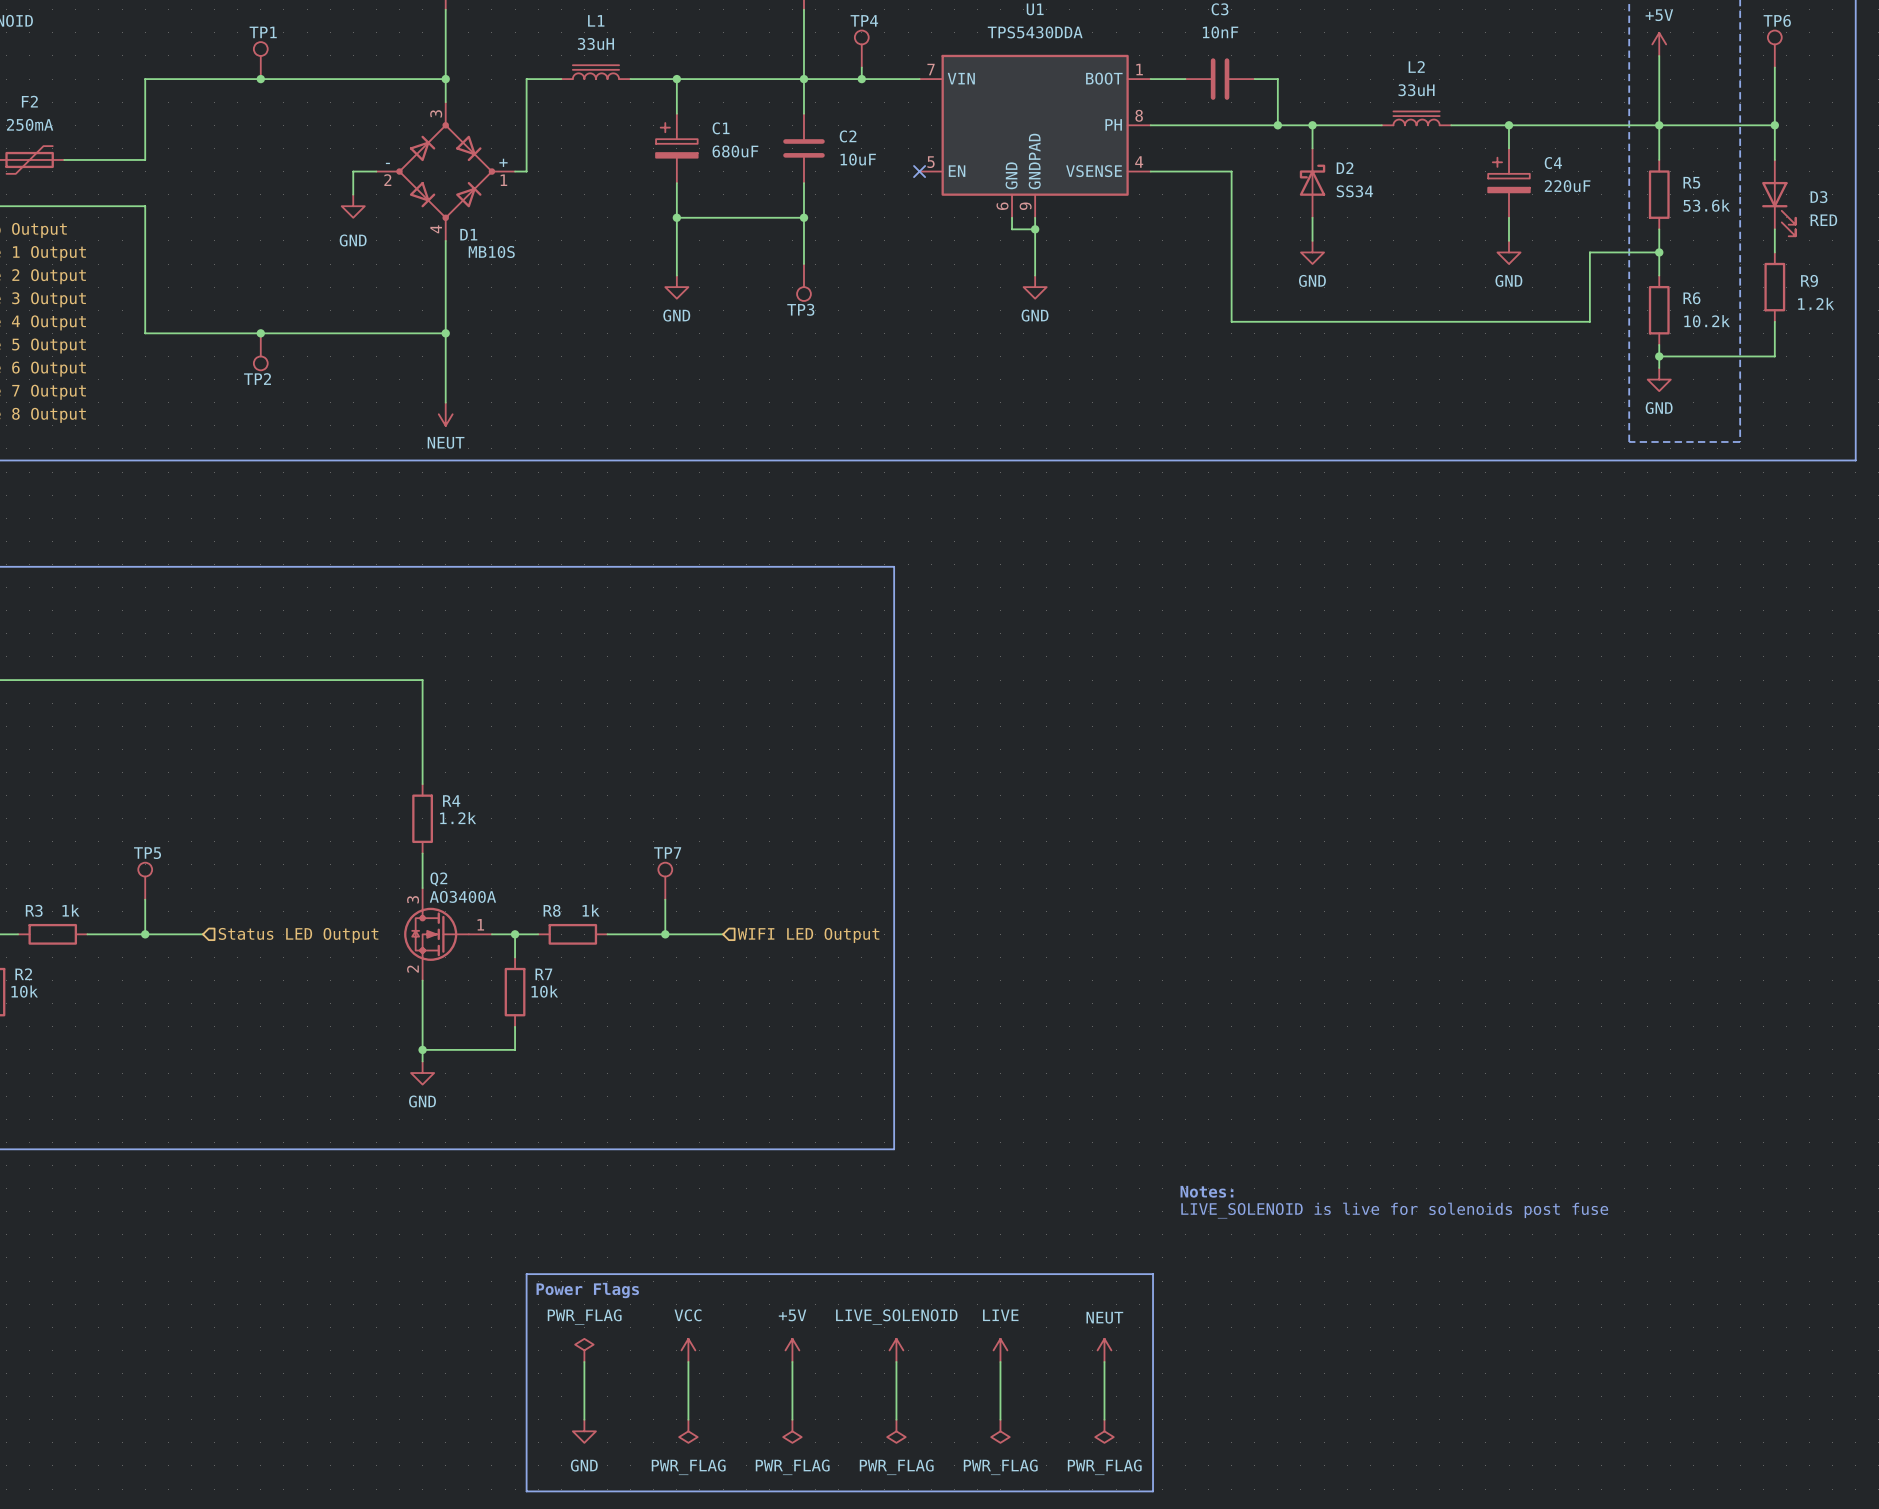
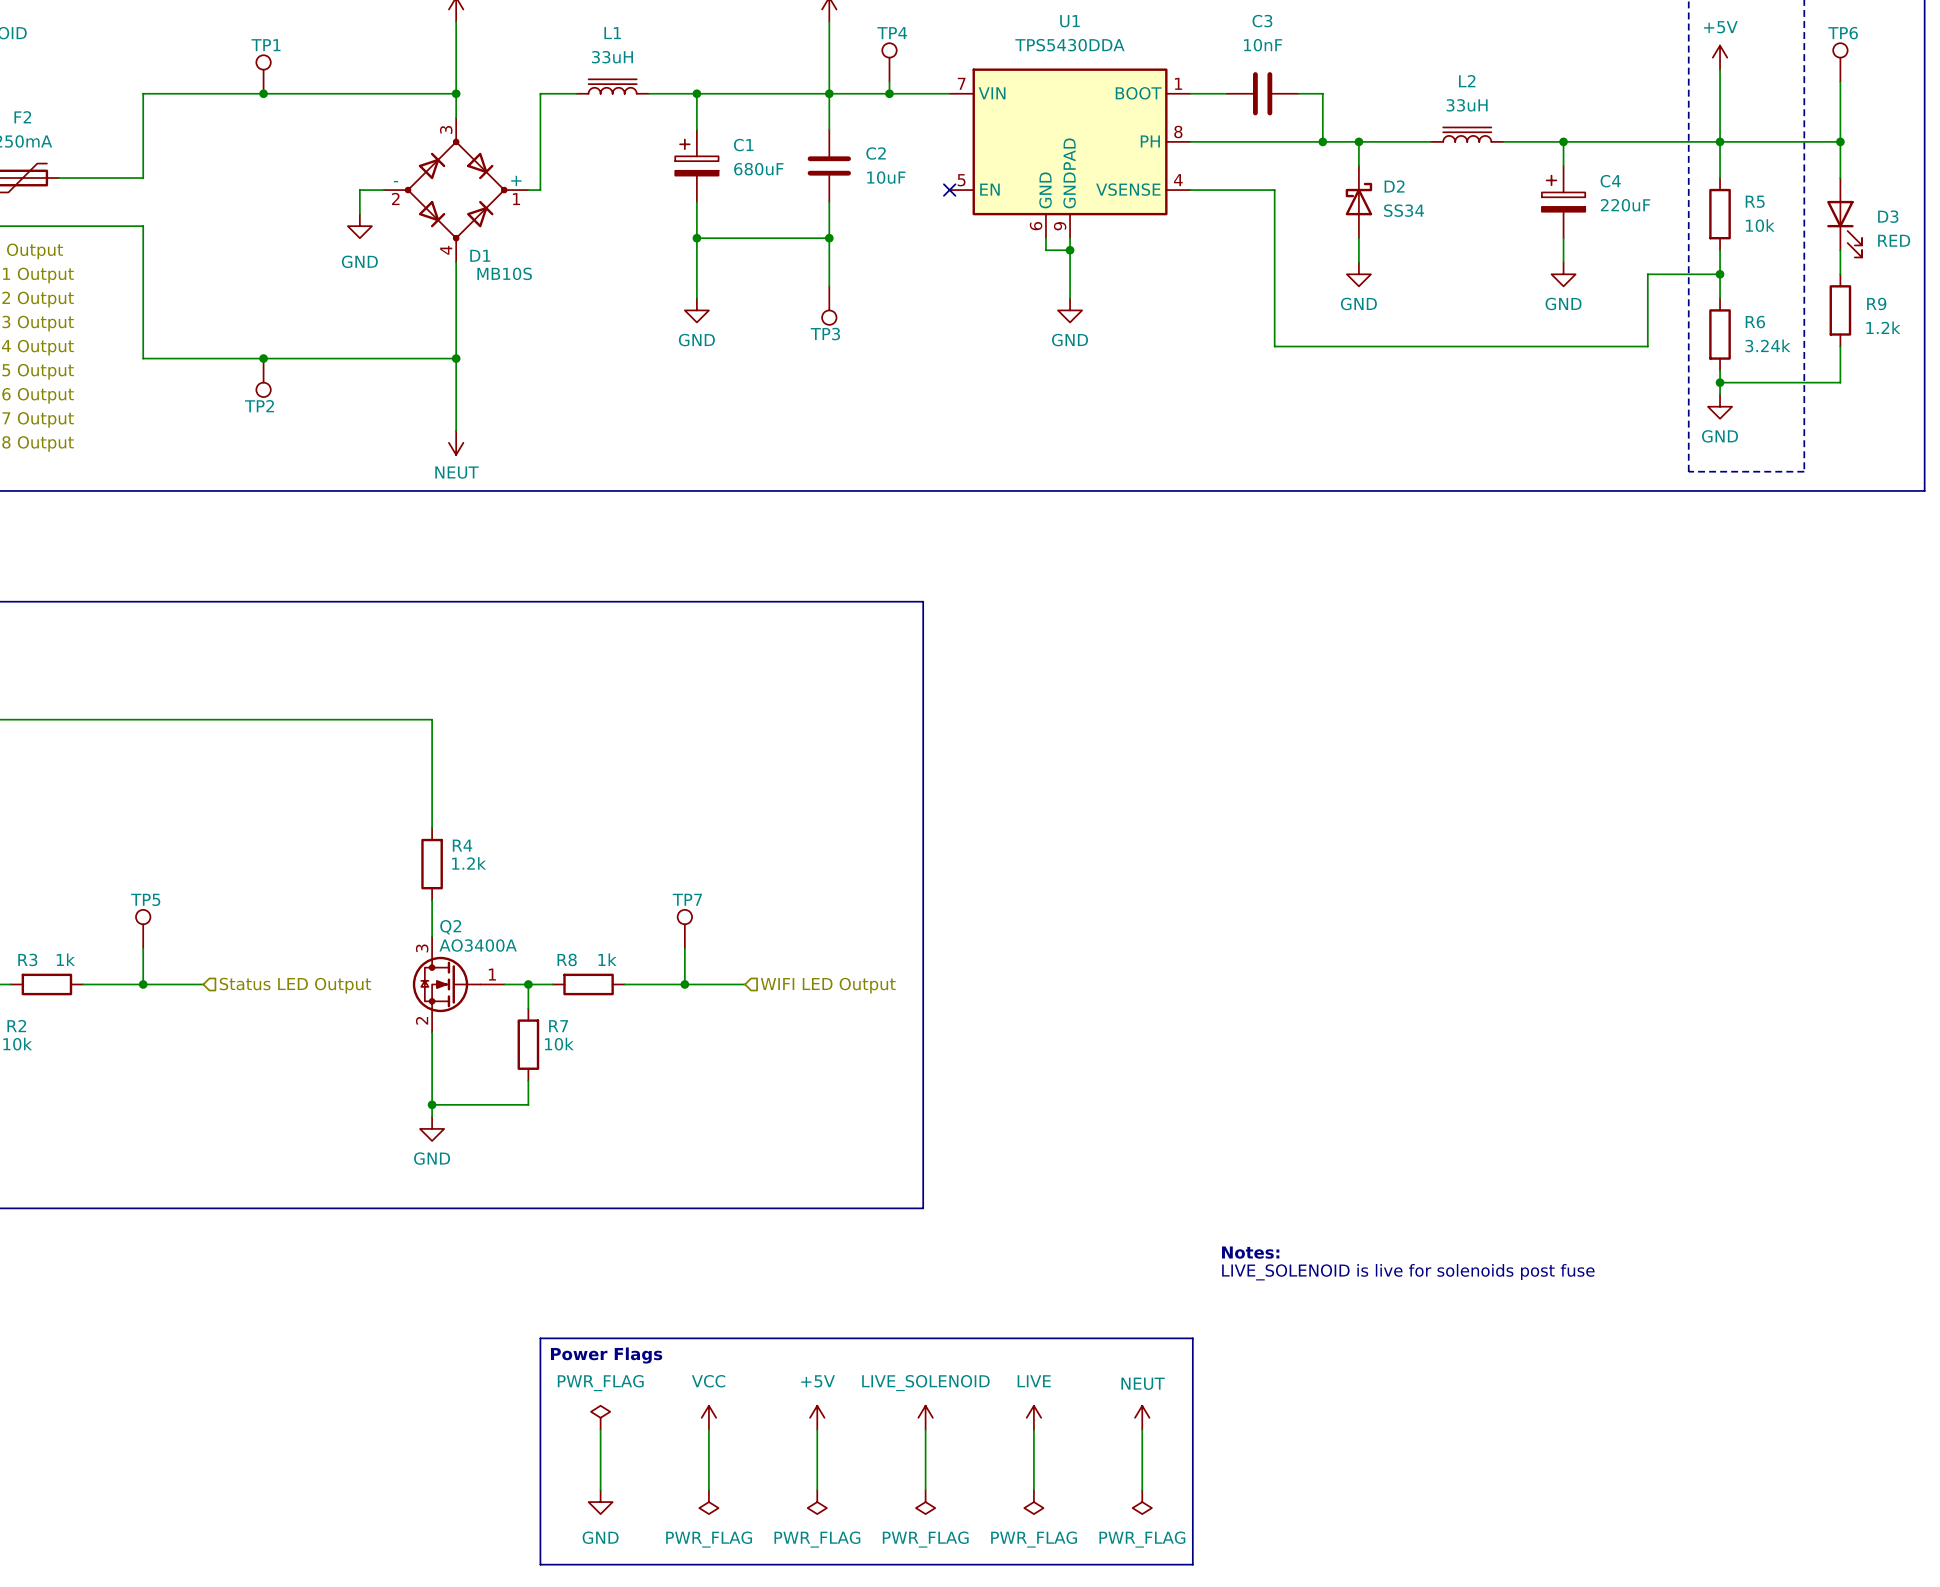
R5 value: 53.6k (1706, 205) -> 10k (1760, 225)
R6 value: 10.2k (1707, 321) -> 3.24k (1767, 345)

